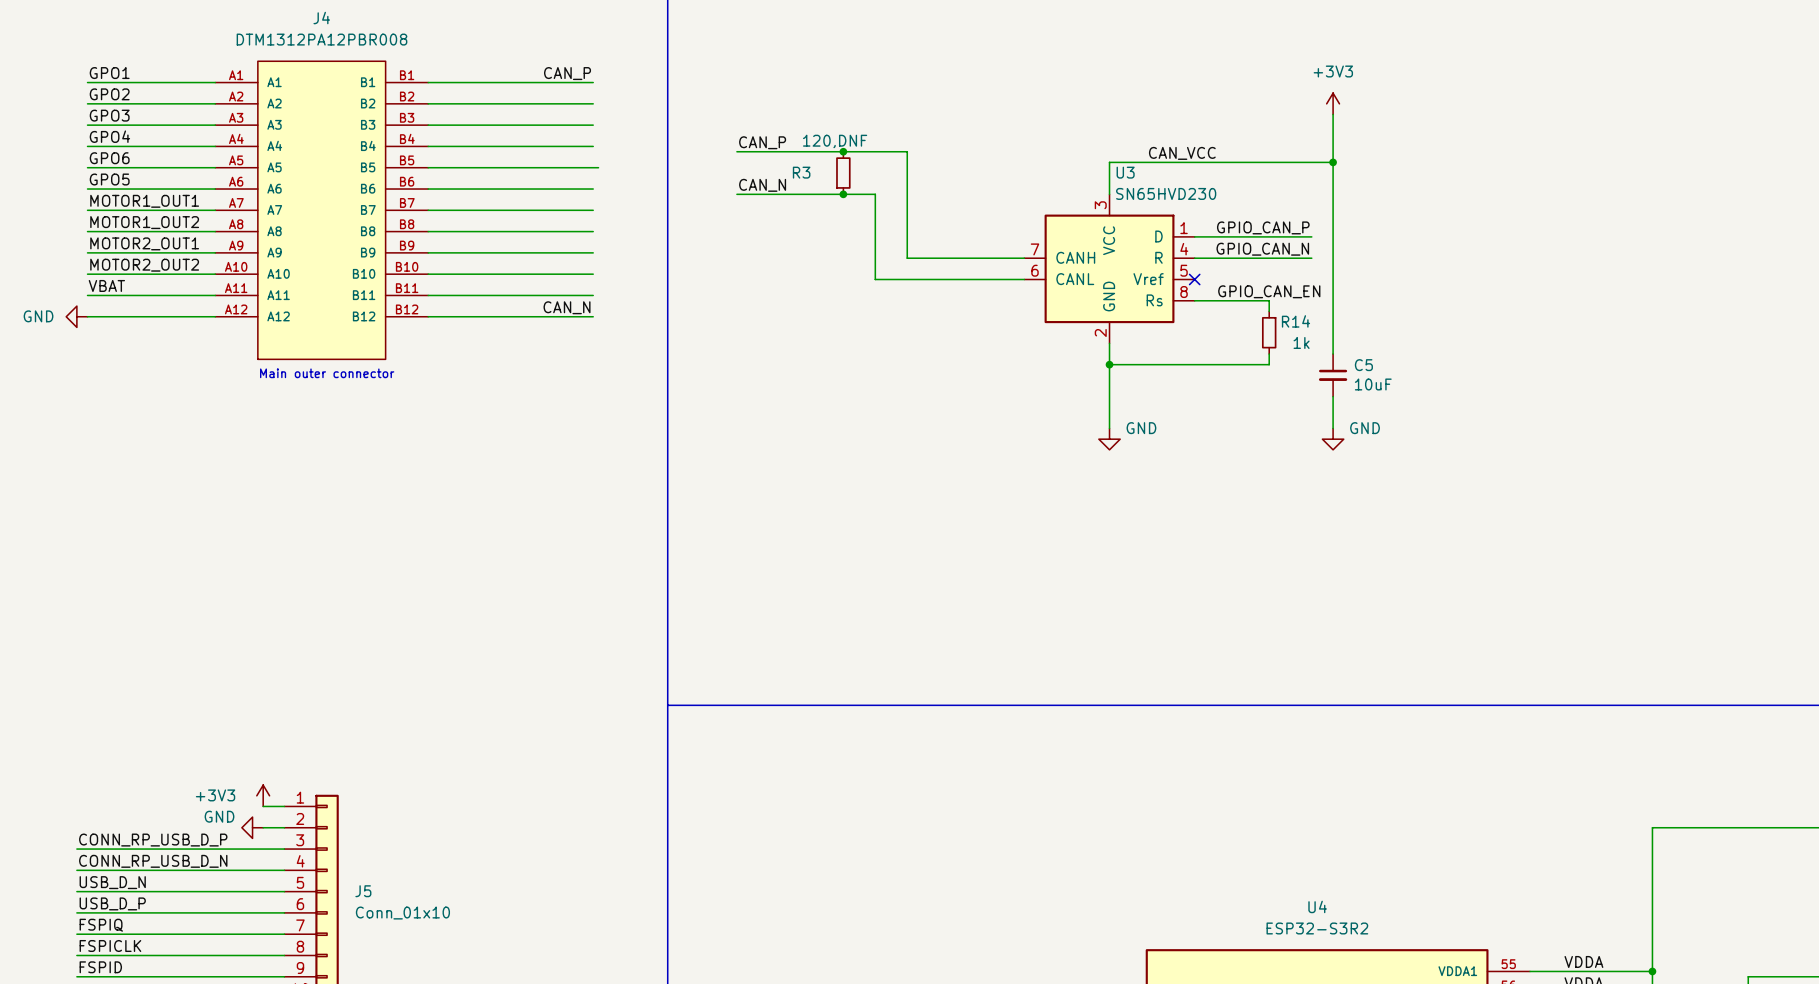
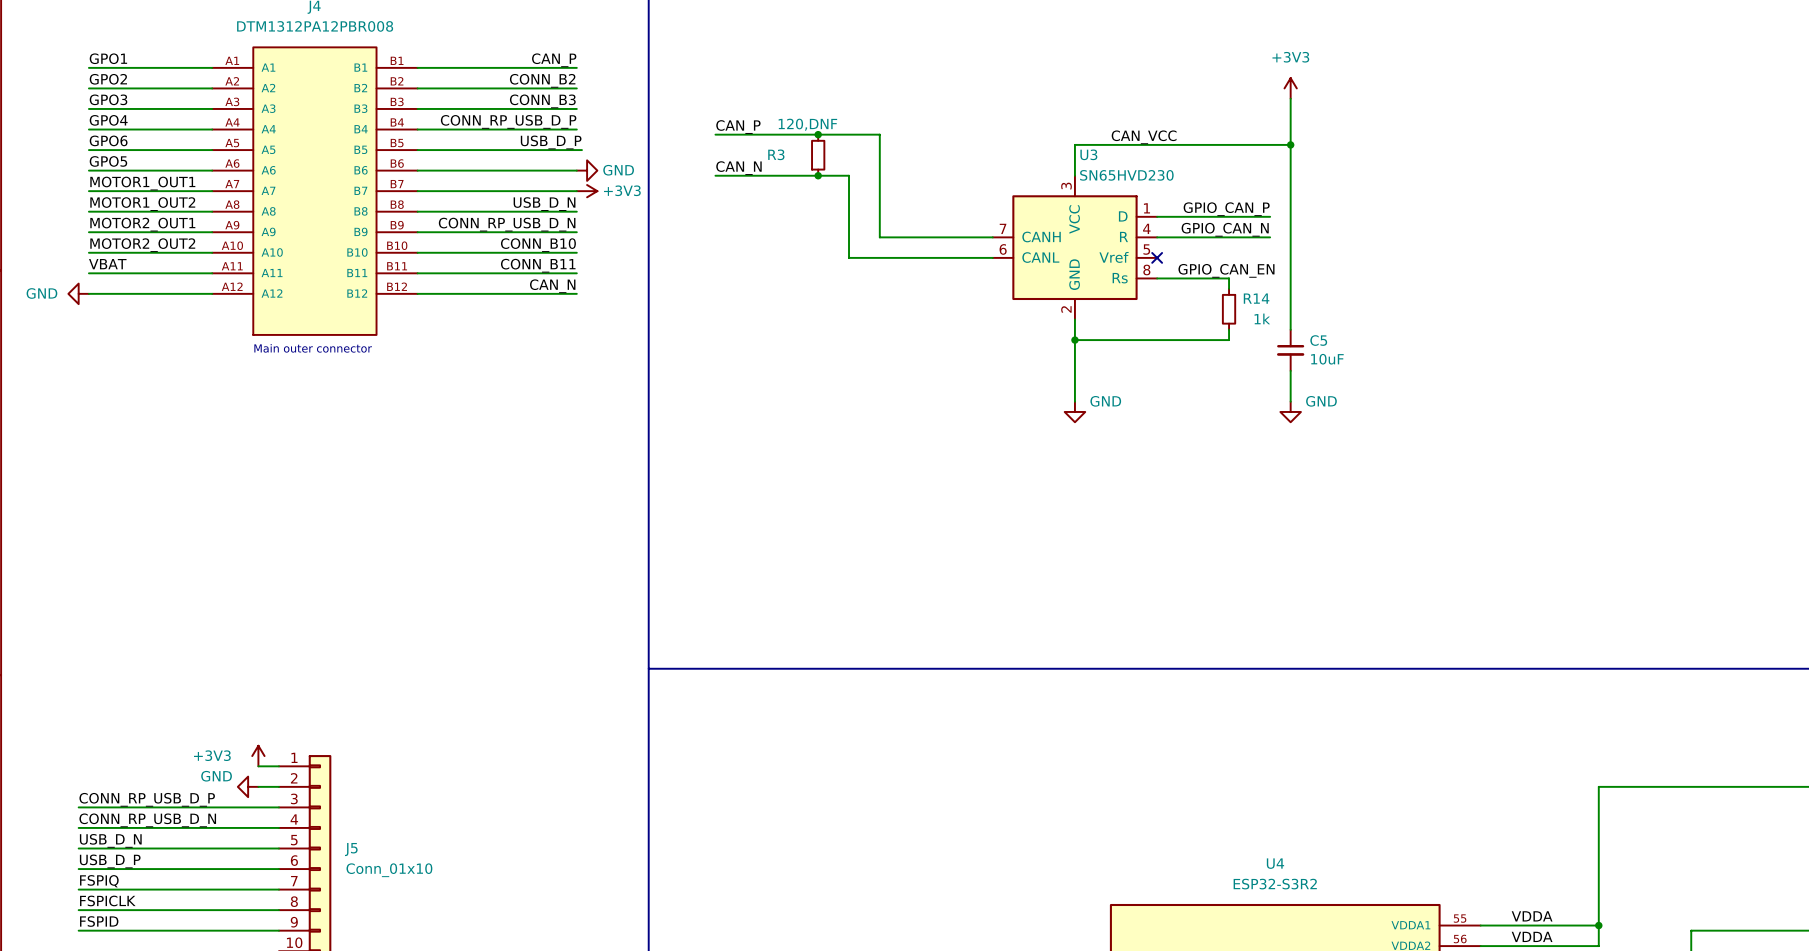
label: none -> CONN_B2 (542, 80)
label: none -> CONN_B3 (542, 101)
label: none -> CONN_RP_USB_D_P (508, 121)
label: none -> USB_D_P (551, 142)
power symbol: none -> GND (587, 170)
power symbol: none -> +3V3 (587, 191)
label: none -> USB_D_N (544, 204)
label: none -> CONN_RP_USB_D_N (507, 224)
label: none -> CONN_B10 (538, 245)
label: none -> CONN_B11 (538, 265)

